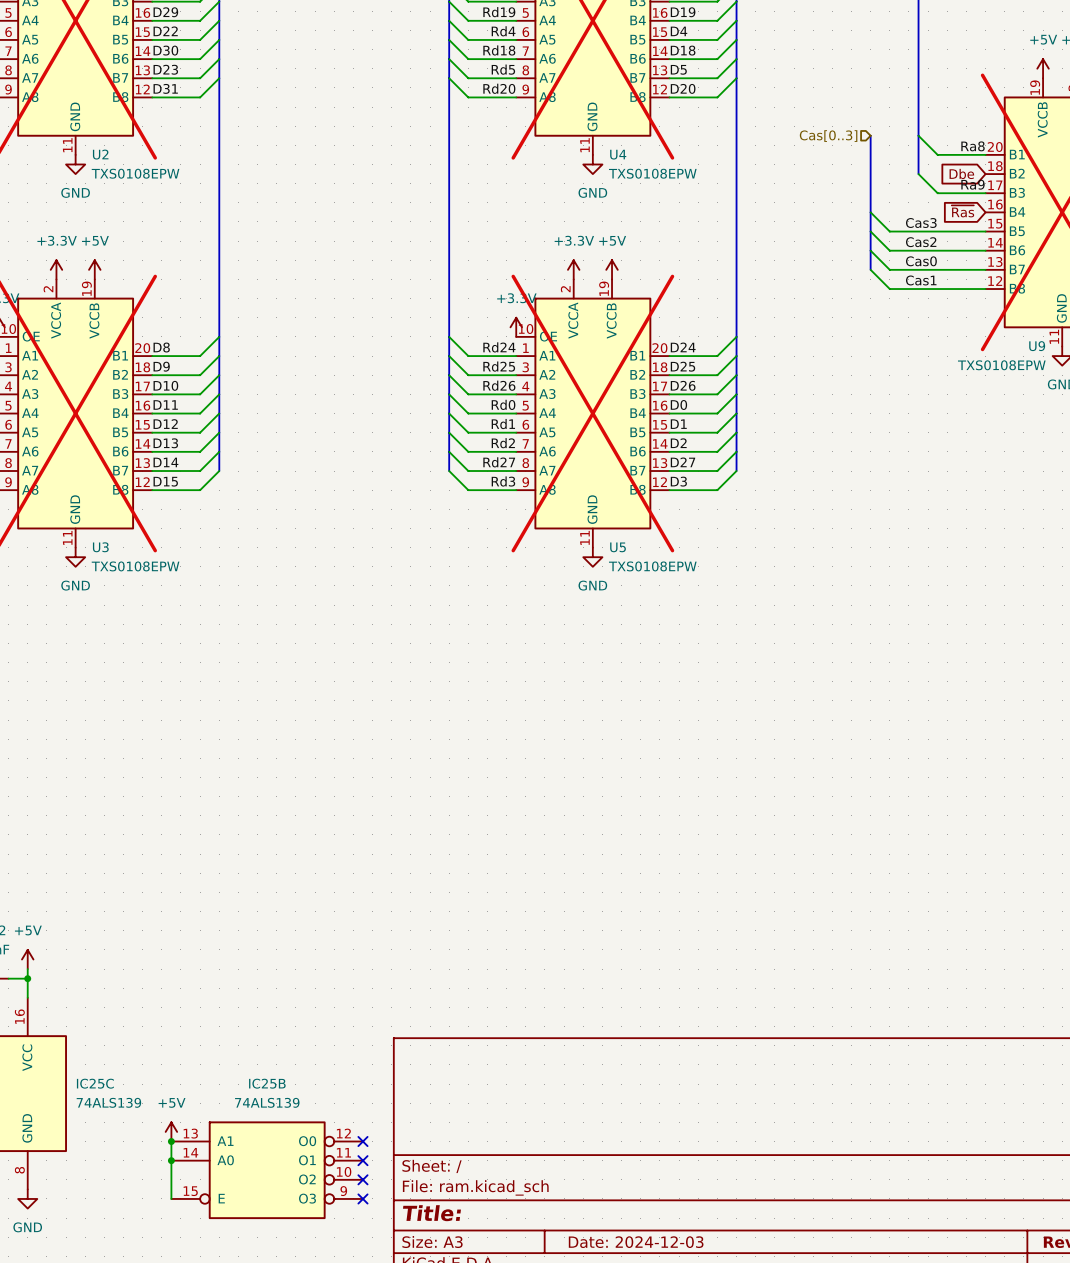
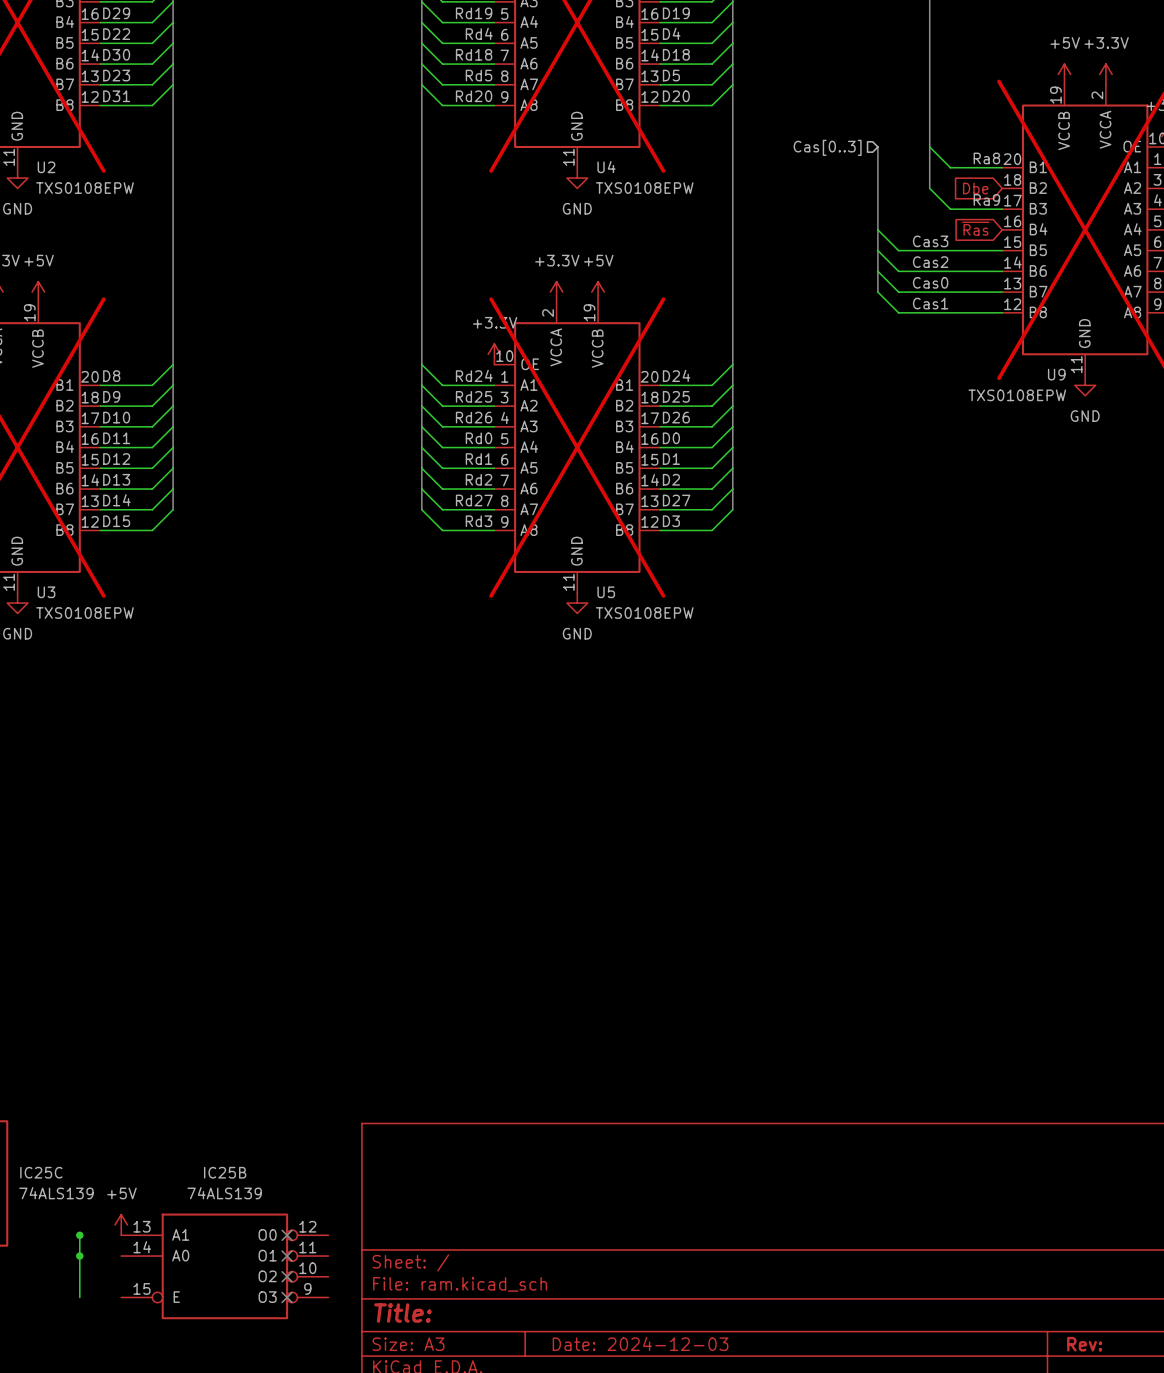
junction: none -> (79, 1235)
wire: (171, 1141) (171, 1198) -> (79, 1235) (79, 1297)
junction: (171, 1141) -> none
no-connect mark: none -> (287, 1235)
no-connect mark: (362, 1141) -> none
junction: none -> (79, 1256)
junction: (171, 1160) -> none
no-connect mark: none -> (287, 1256)
no-connect mark: (362, 1160) -> none
no-connect mark: none -> (287, 1276)
no-connect mark: (362, 1179) -> none
no-connect mark: none -> (287, 1297)
no-connect mark: (362, 1198) -> none

